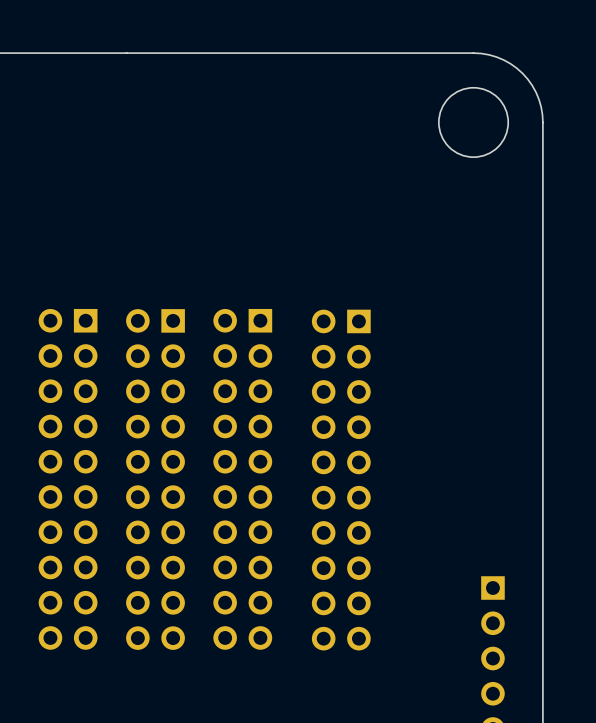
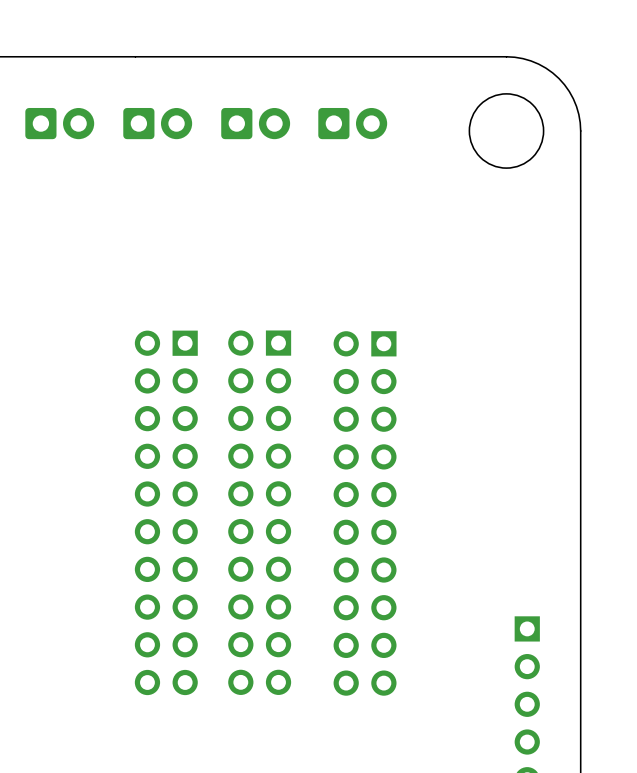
part: none -> (59, 123)
part: none -> (157, 123)
part: none -> (255, 123)
part: none -> (352, 123)
part: (68, 479) -> none

